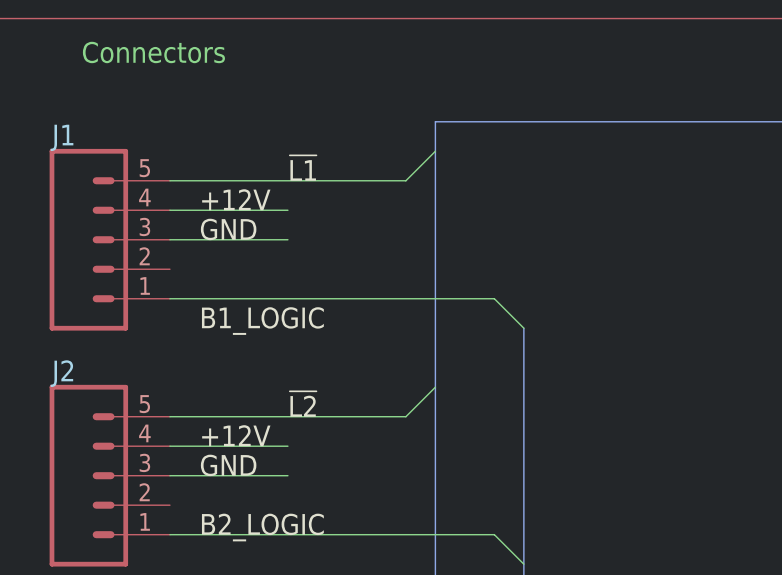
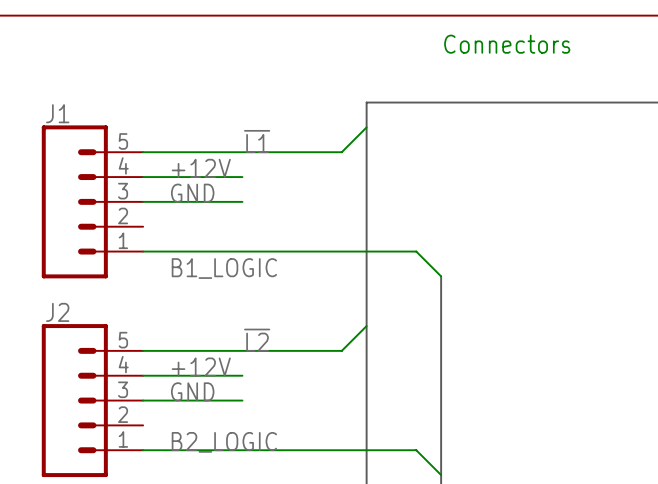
text: Connectors (153, 52) -> none
text: none -> Connectors (507, 44)

